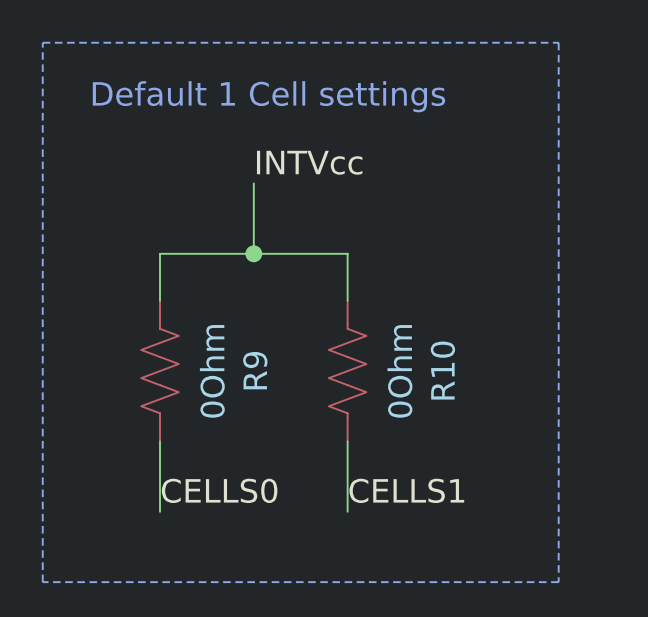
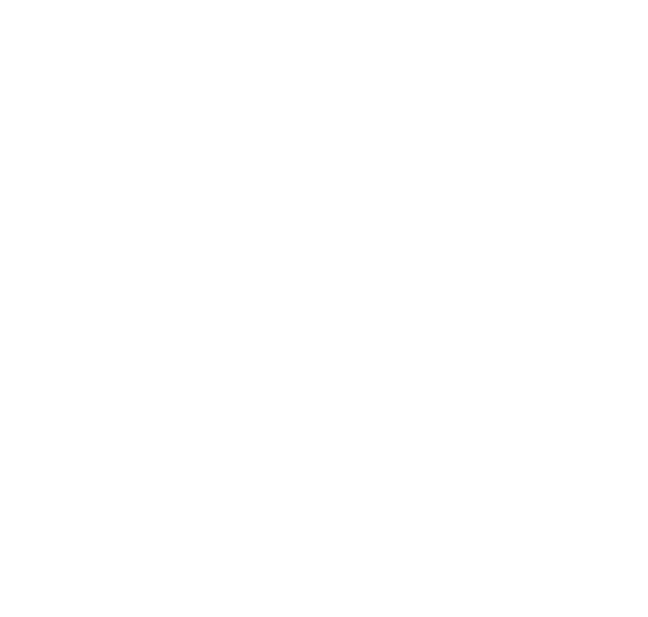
line: (42, 42) (558, 42) (558, 582) (42, 582) (42, 42) -> none
text: Default 1 Cell settings (268, 96) -> none
label: INTVcc (309, 162) -> none
wire: (253, 183) (253, 253) -> none
junction: (253, 253) -> none
wire: (160, 300) (160, 253) (347, 253) (347, 300) -> none
R9: 0Ohm (160, 371) -> none
R10: 0Ohm (347, 371) -> none
wire: (160, 441) (160, 511) -> none
wire: (347, 441) (347, 511) -> none
label: CELLS0 (219, 490) -> none
label: CELLS1 (406, 490) -> none

